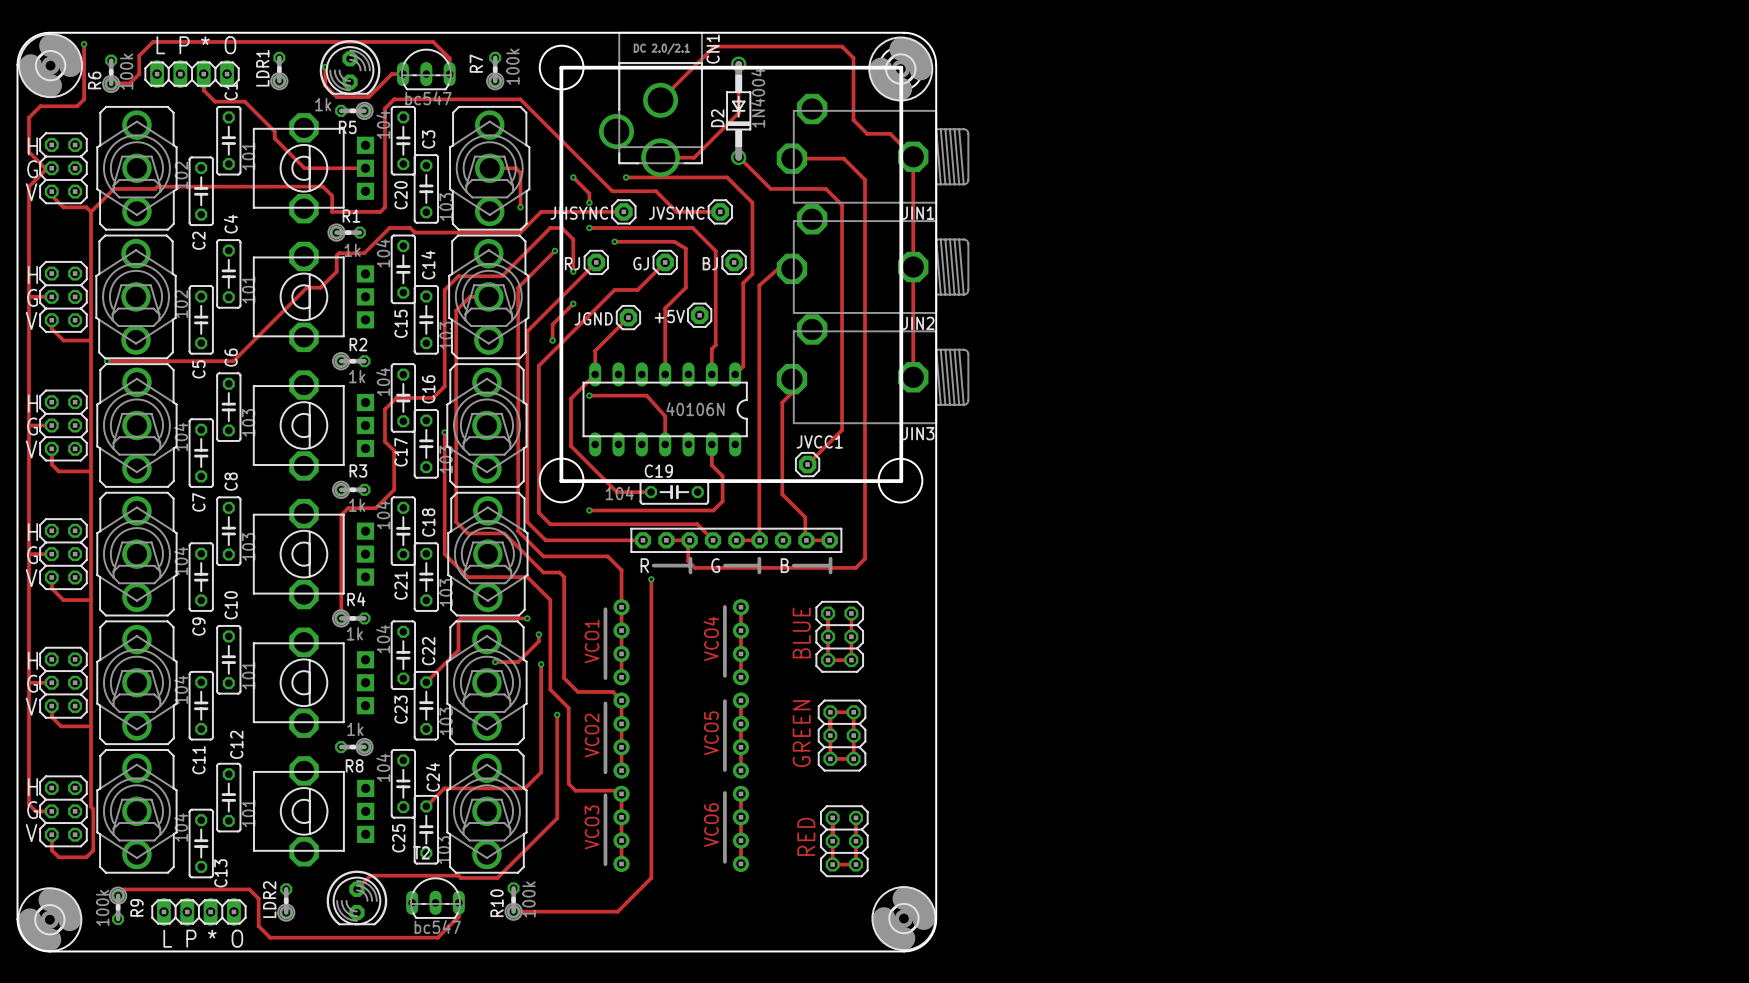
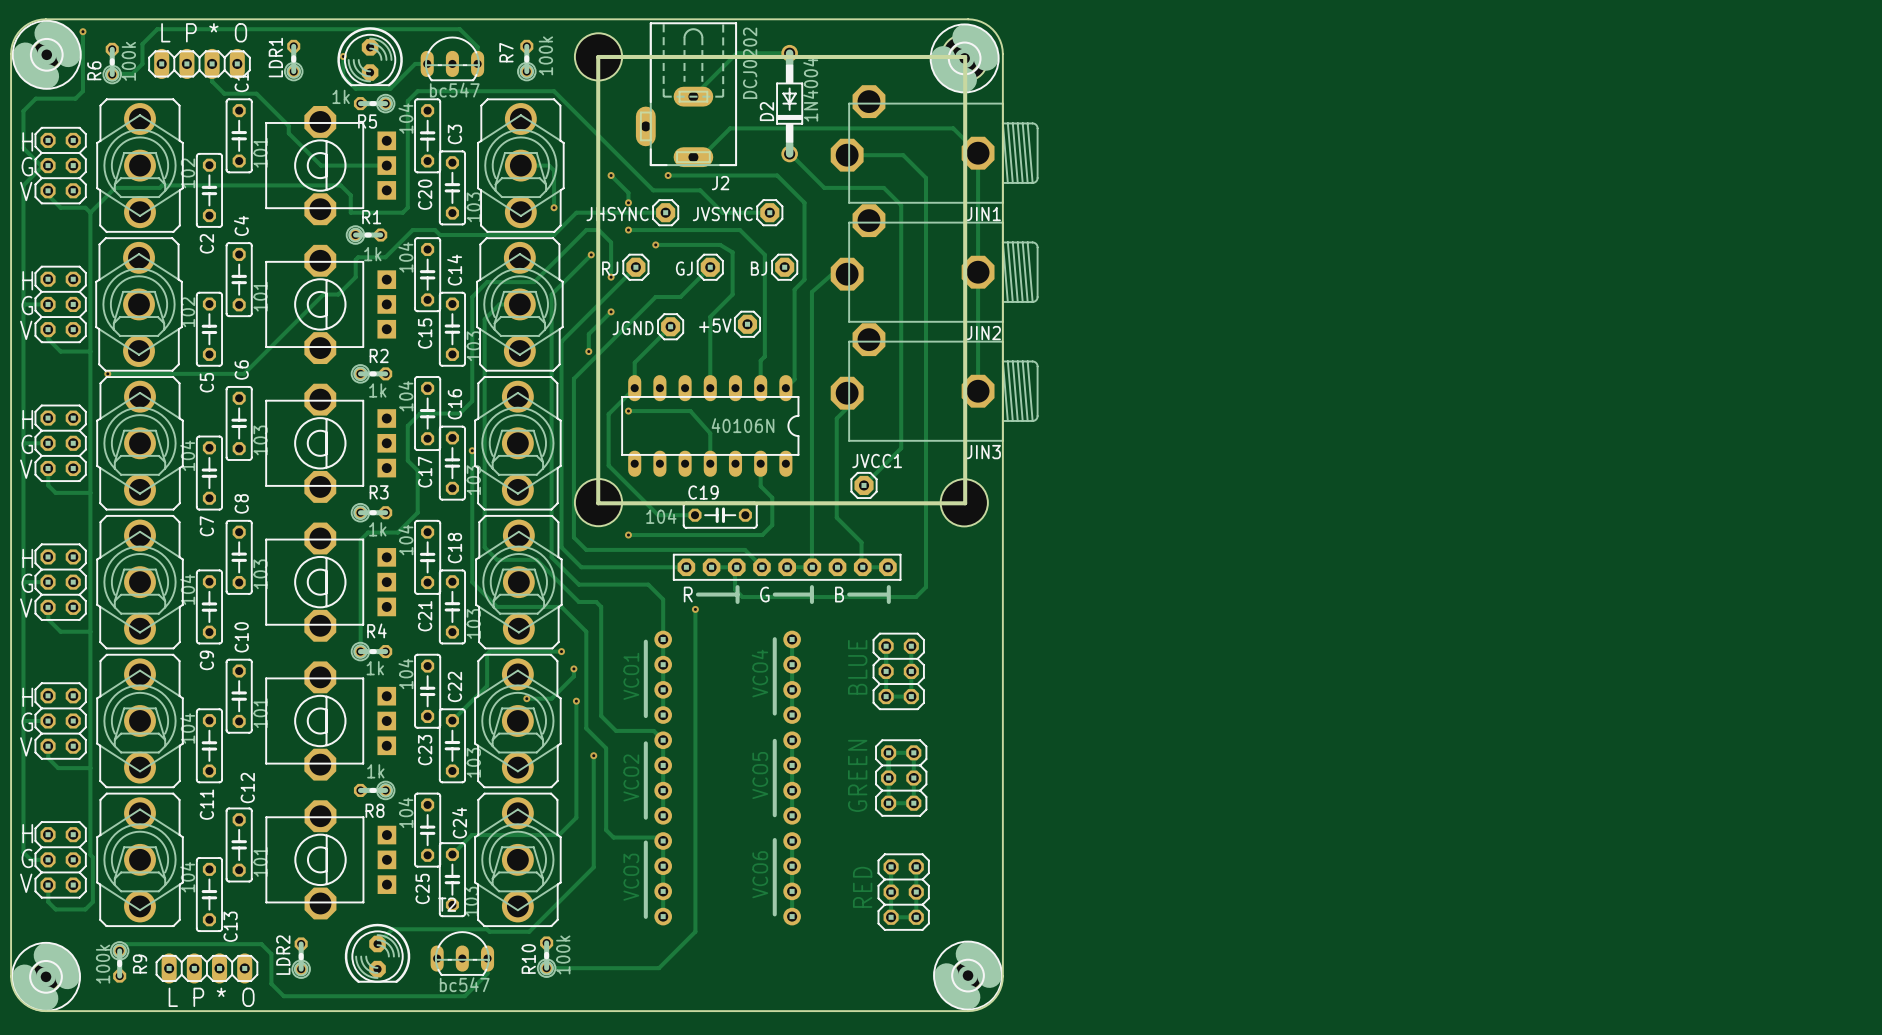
track: (738, 64) (738, 113) (694, 157) (660, 157) -> (789, 53) (736, 53) (693, 96)
track: (660, 100) (714, 46) (842, 46) (853, 58) (853, 120) (867, 133) -> (693, 157) (701, 157) (730, 128) (928, 128)
J2: none -> DCJ0202 (686, 94)
CN1: (650, 104) -> none

